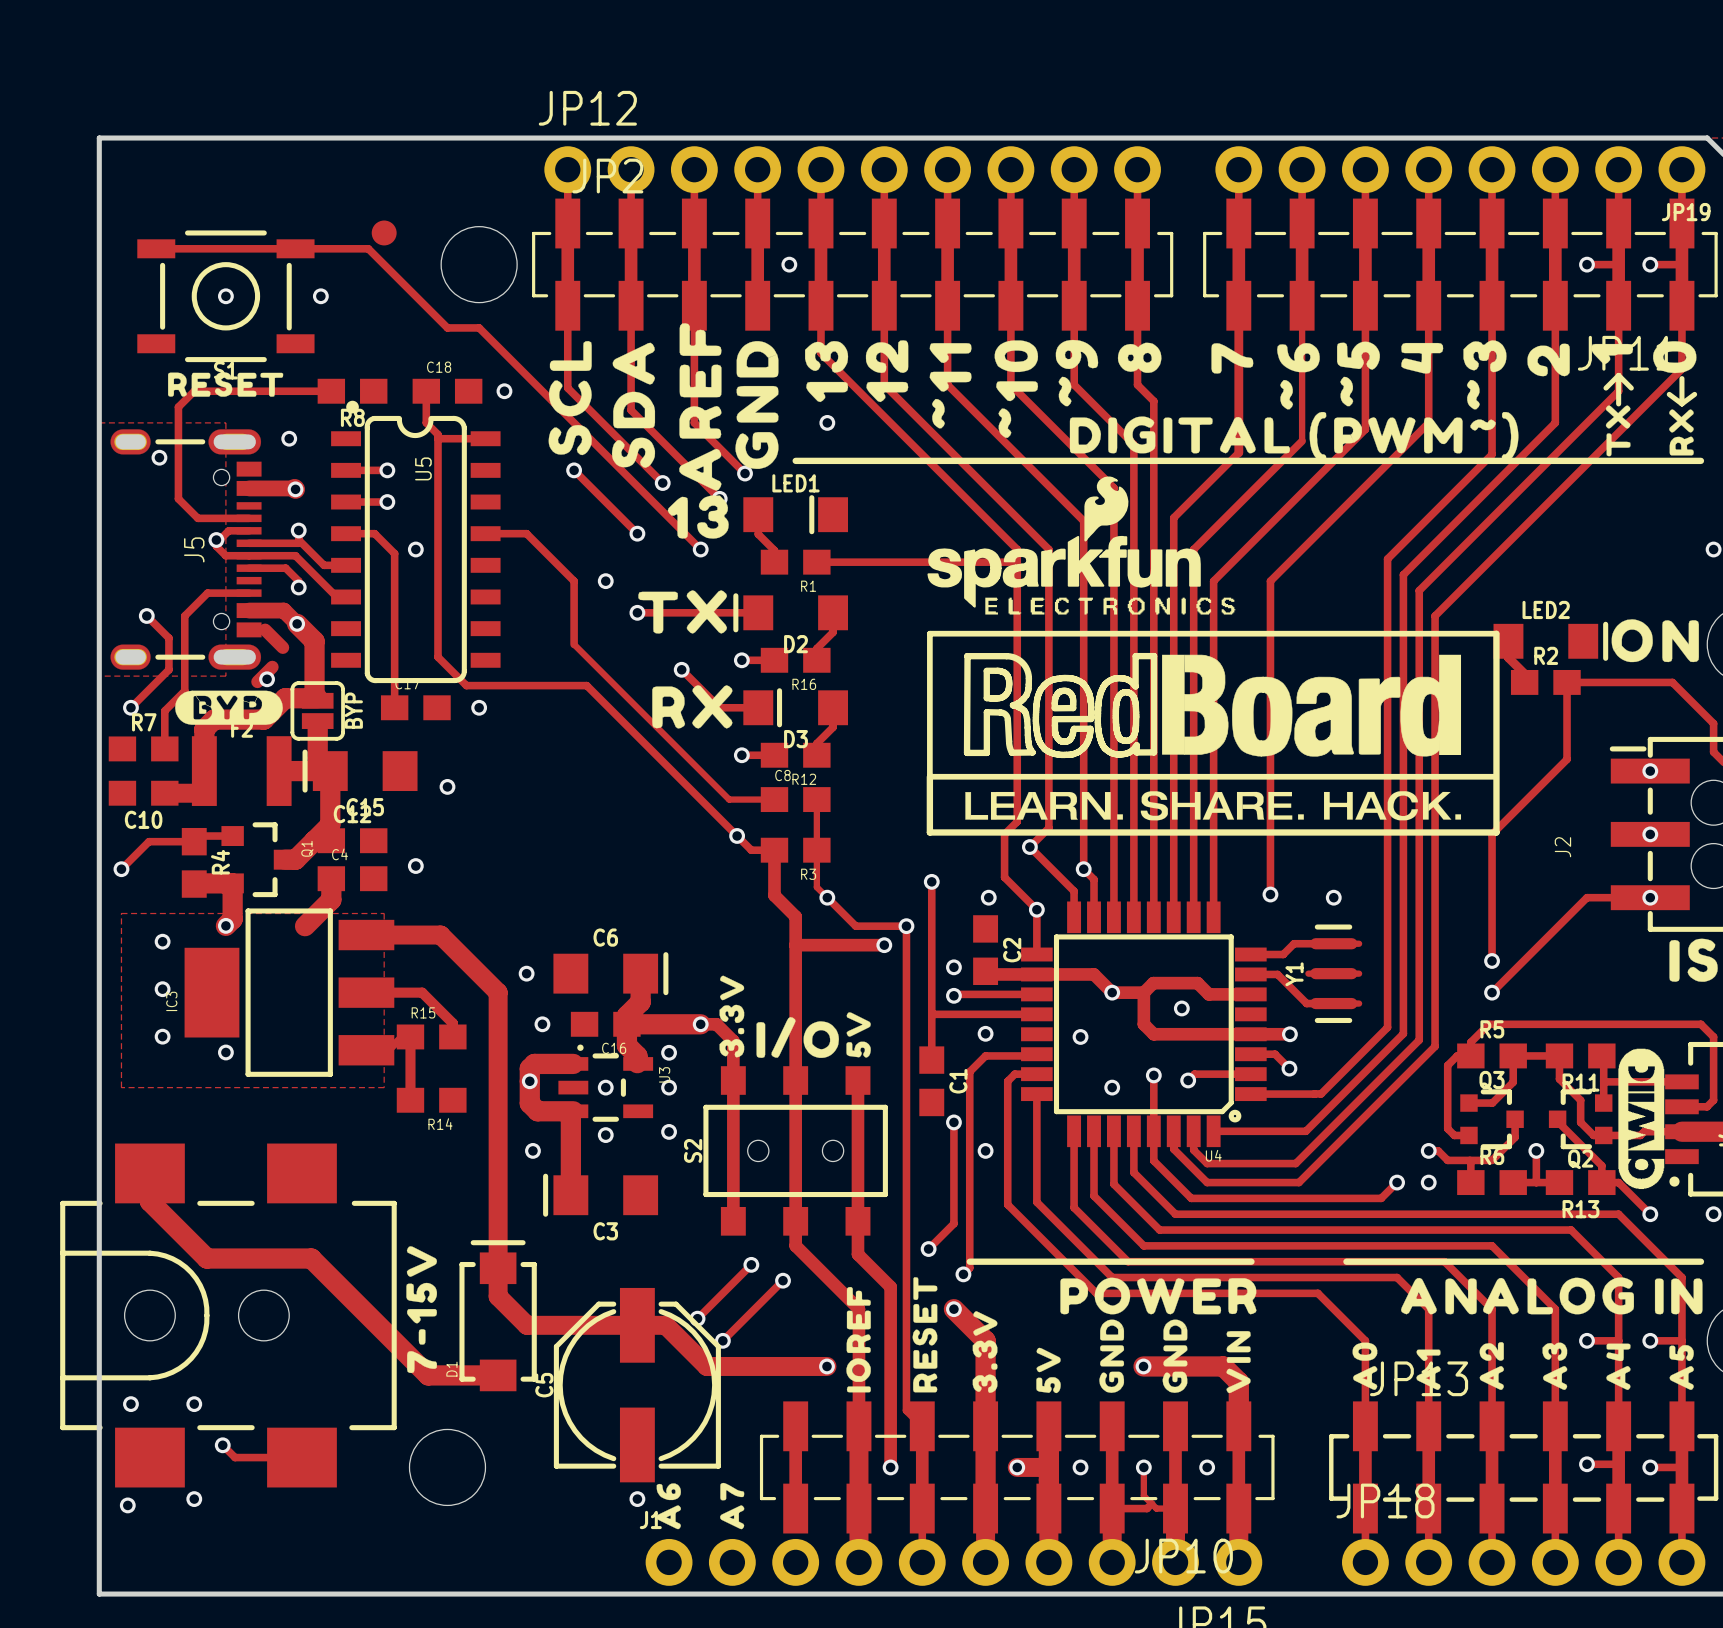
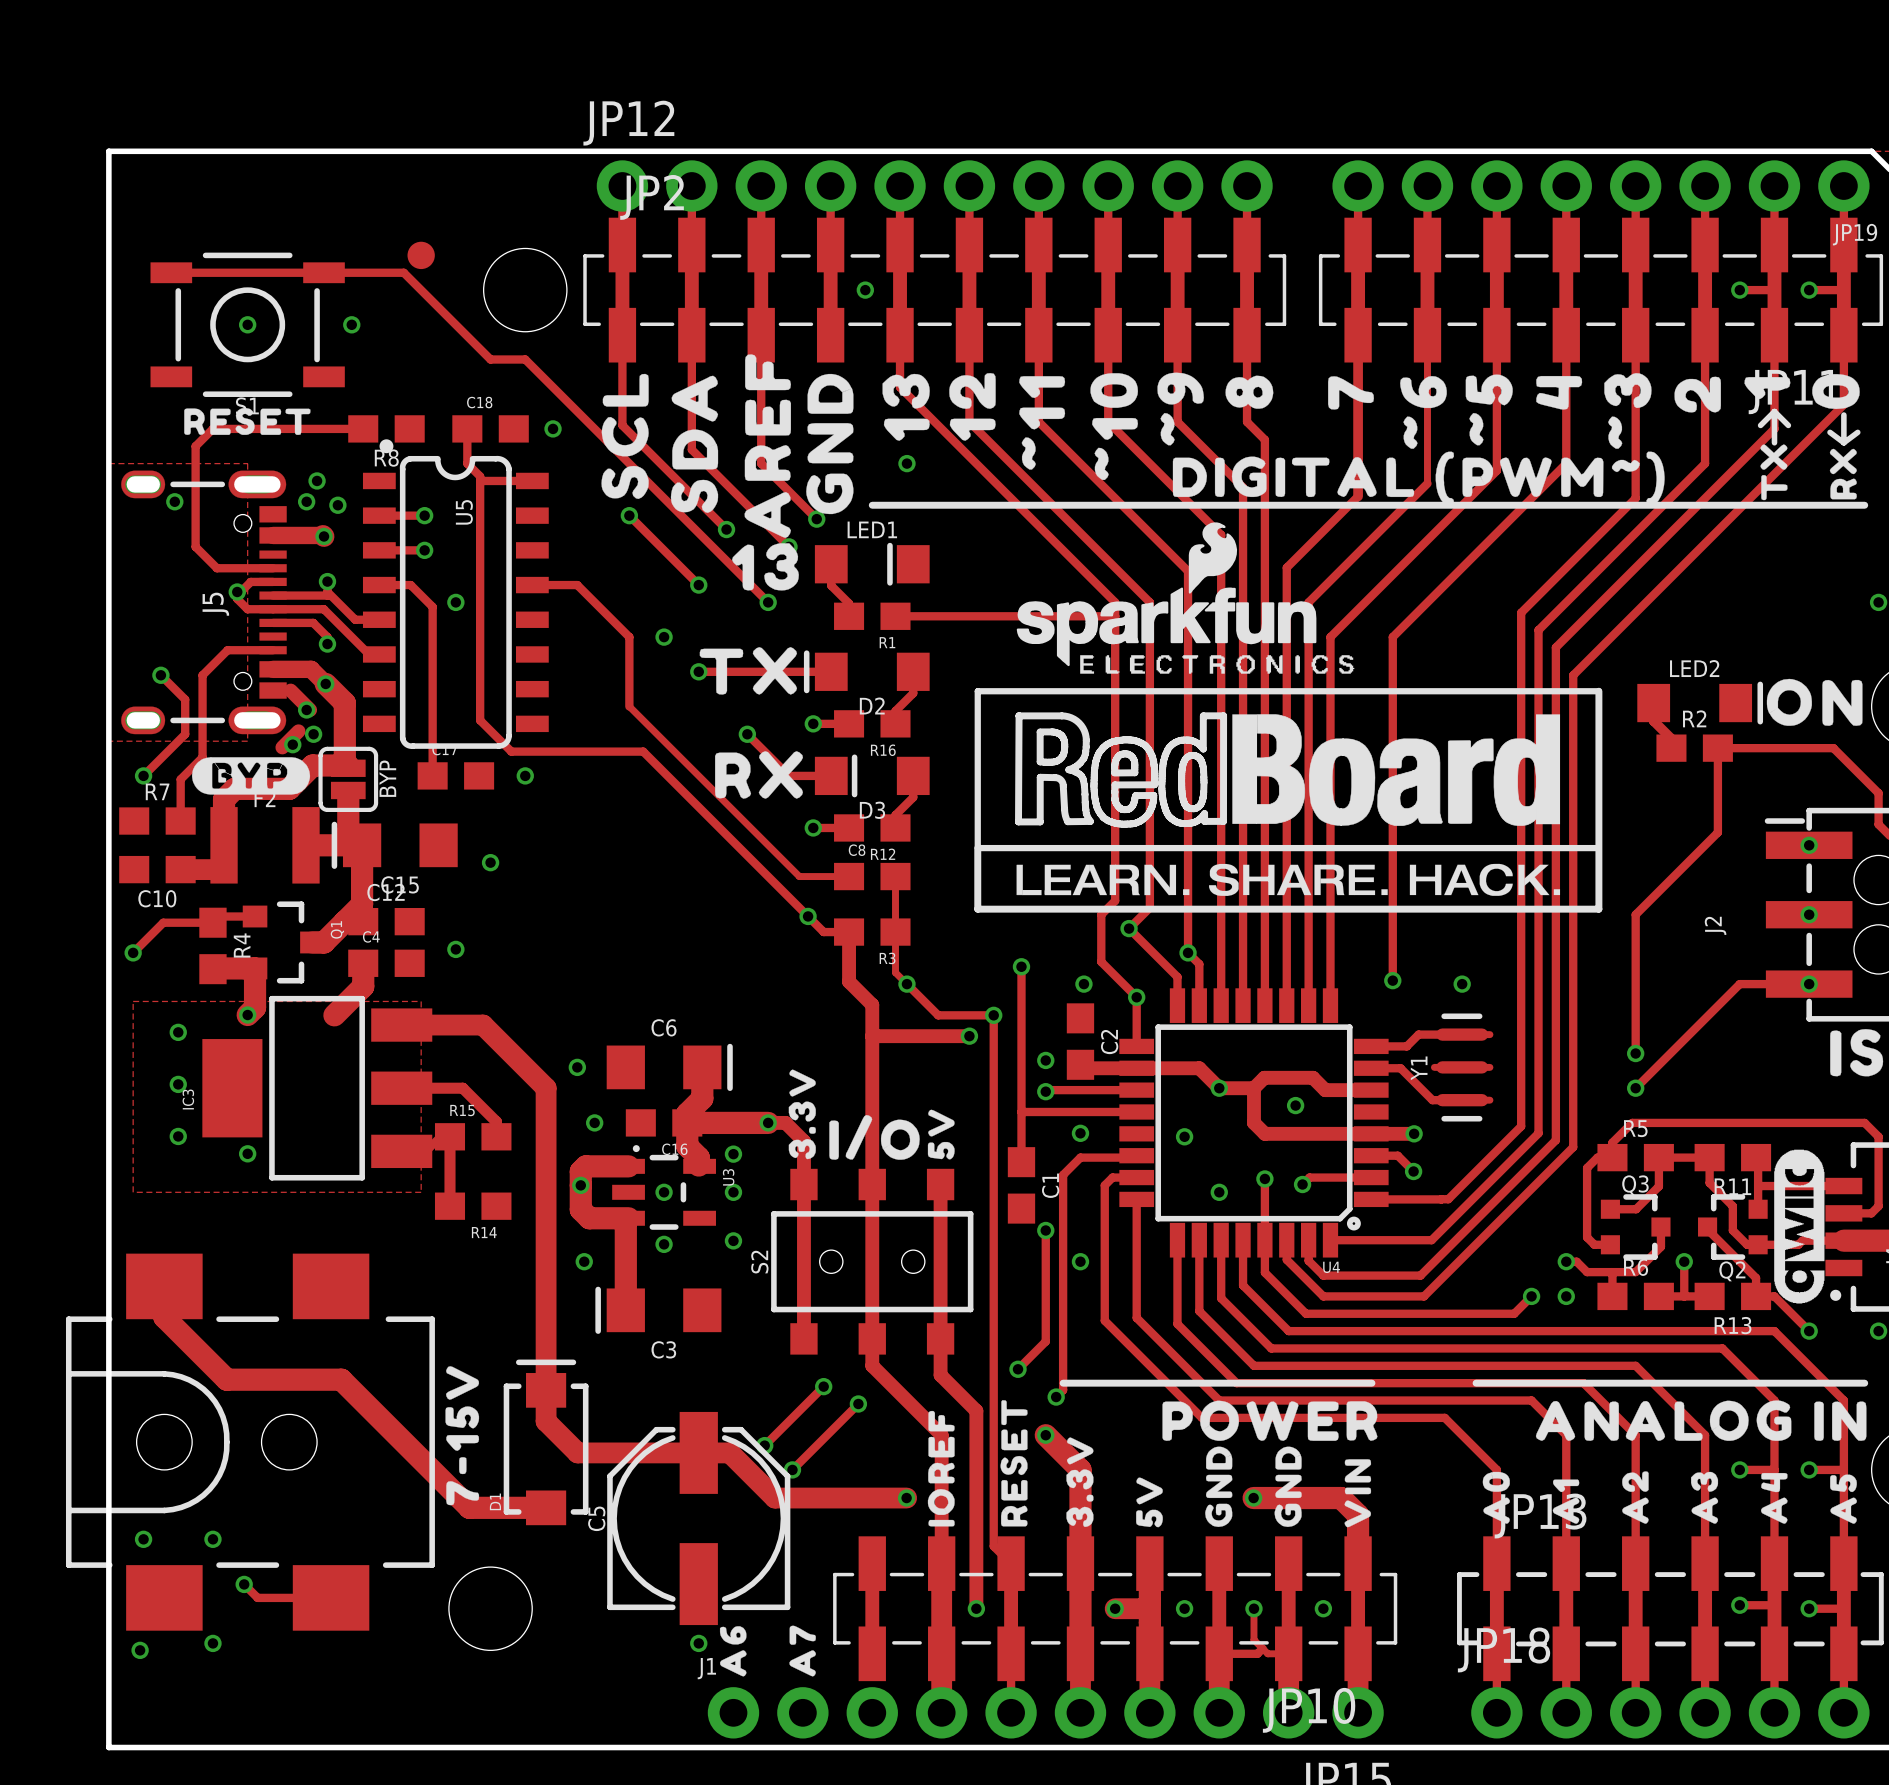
via: none -> (306, 501)
via: none -> (337, 505)
via: none -> (306, 709)
via: none -> (313, 734)
drawing position: (1213, 733) -> (1288, 800)

